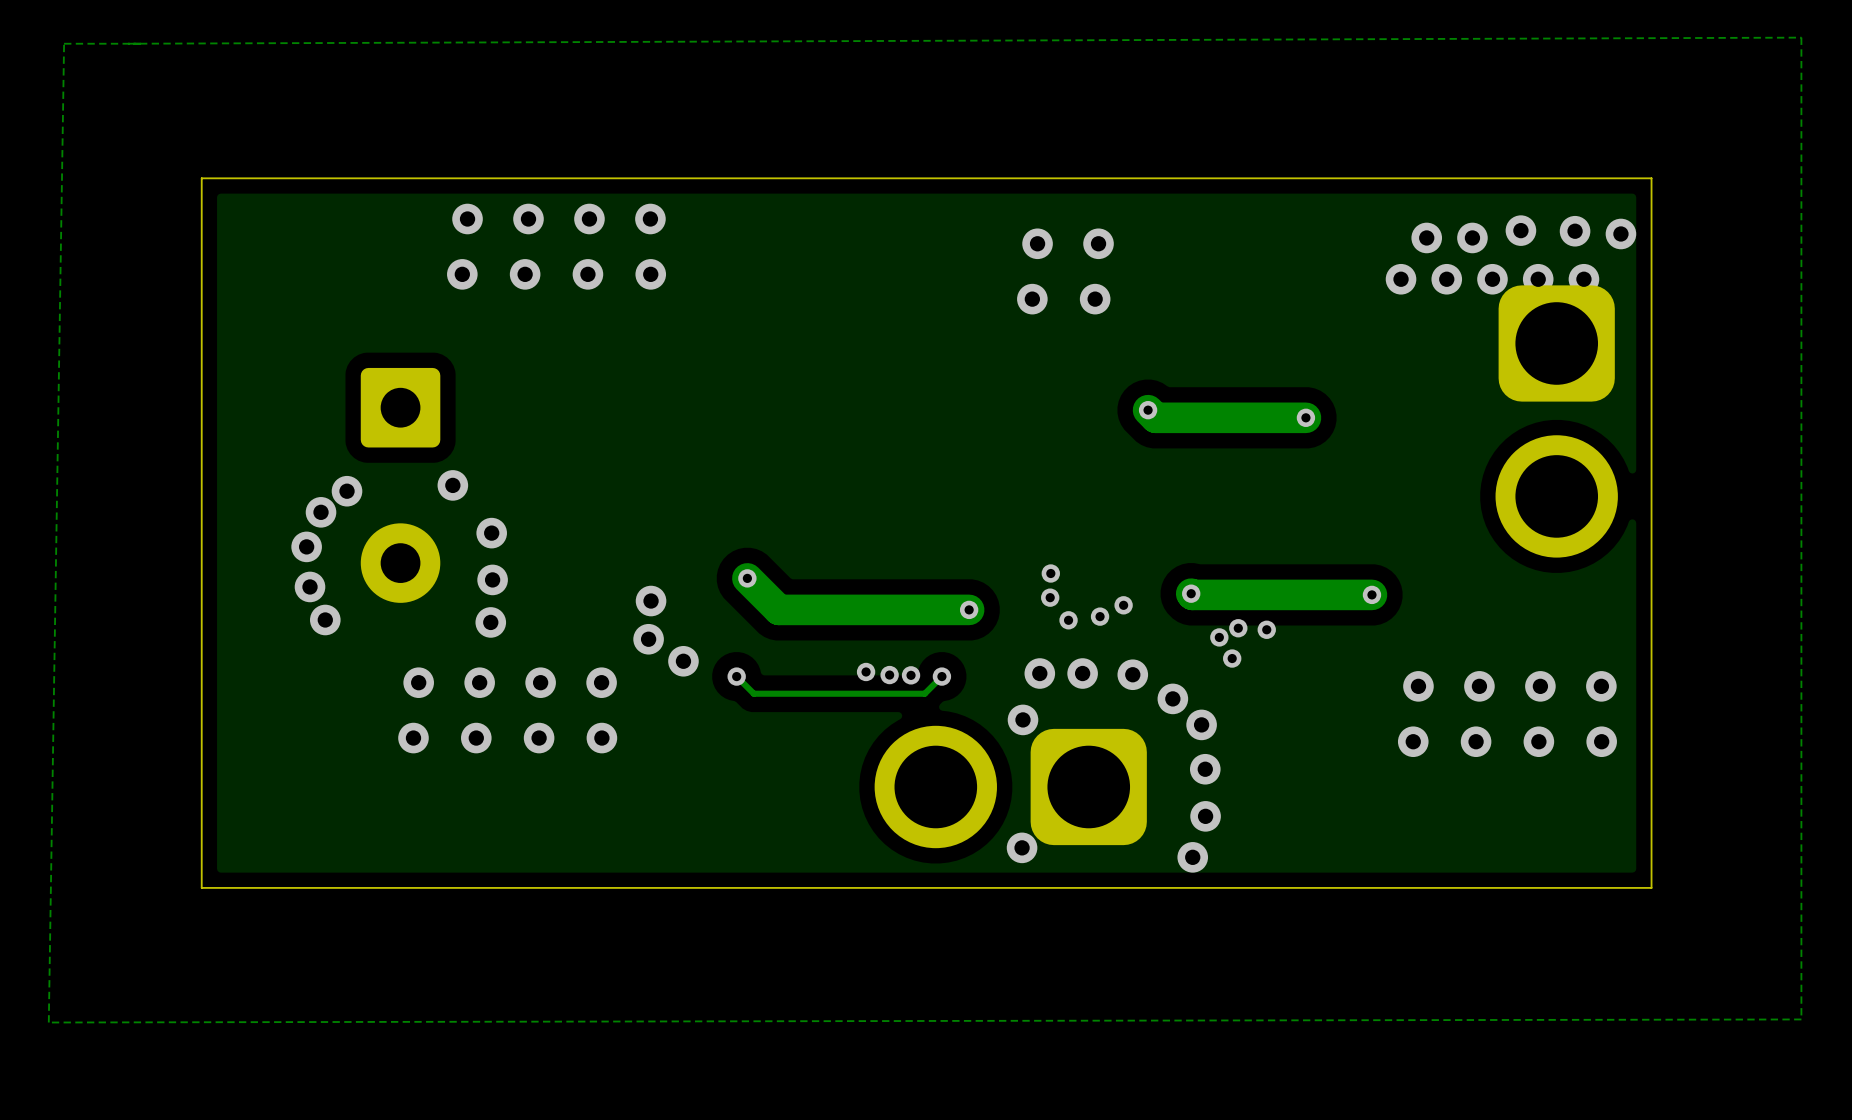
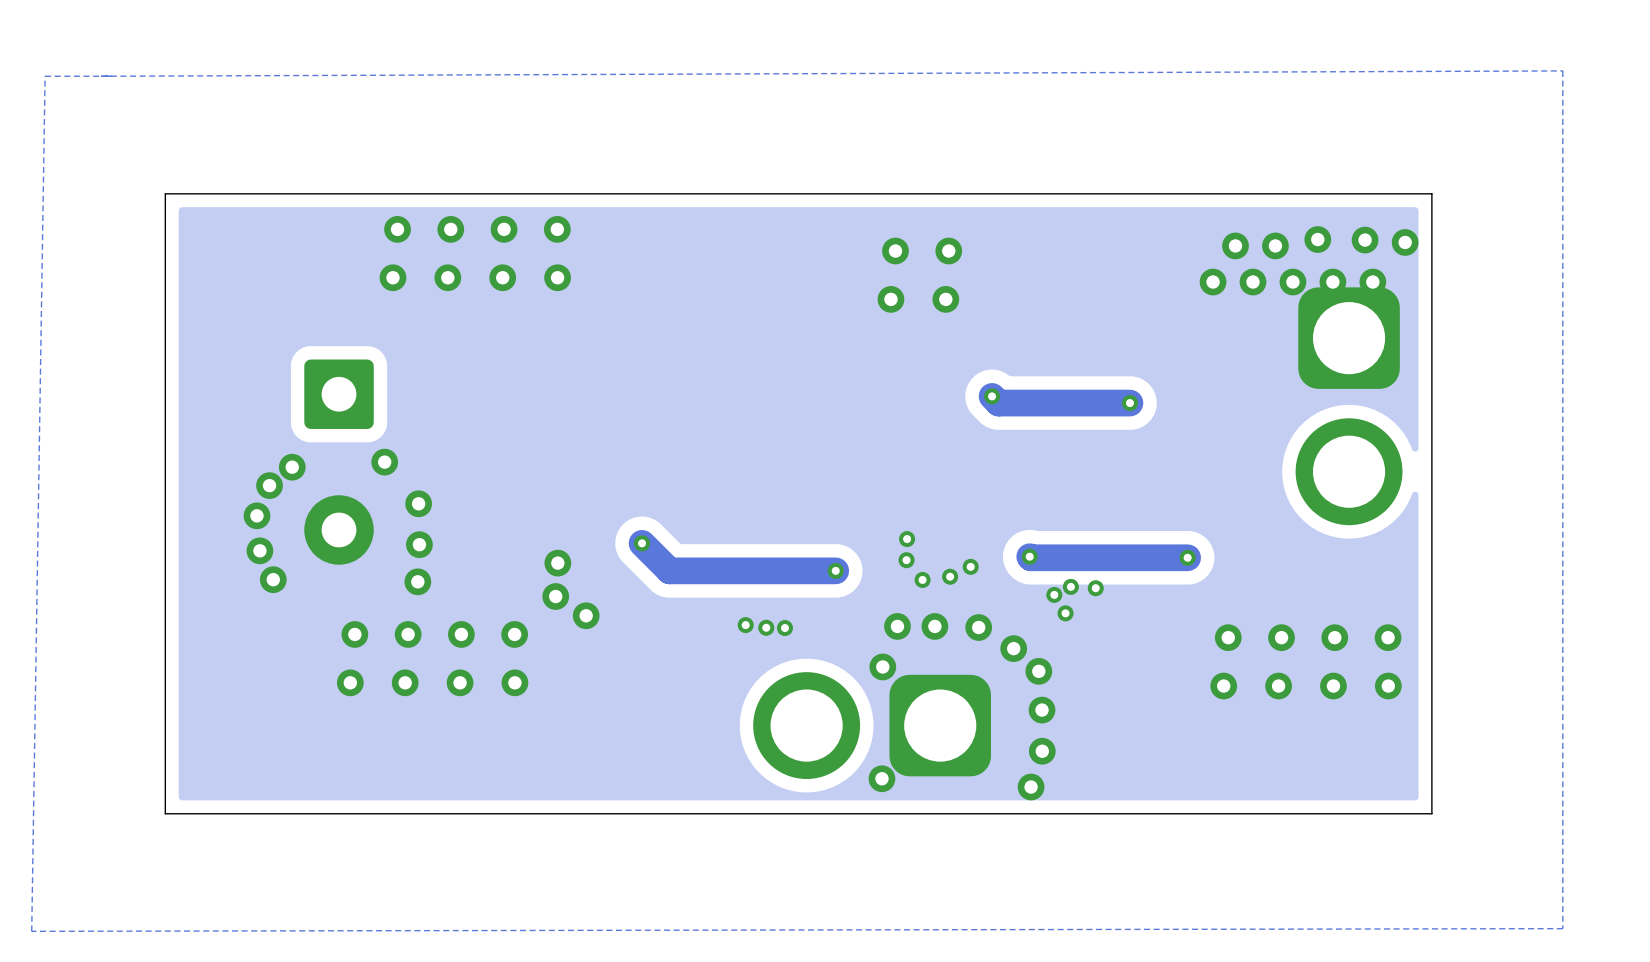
via: (736, 676) -> none
track: (941, 676) (924, 693) (753, 693) (736, 676) -> none
via: (941, 676) -> none

